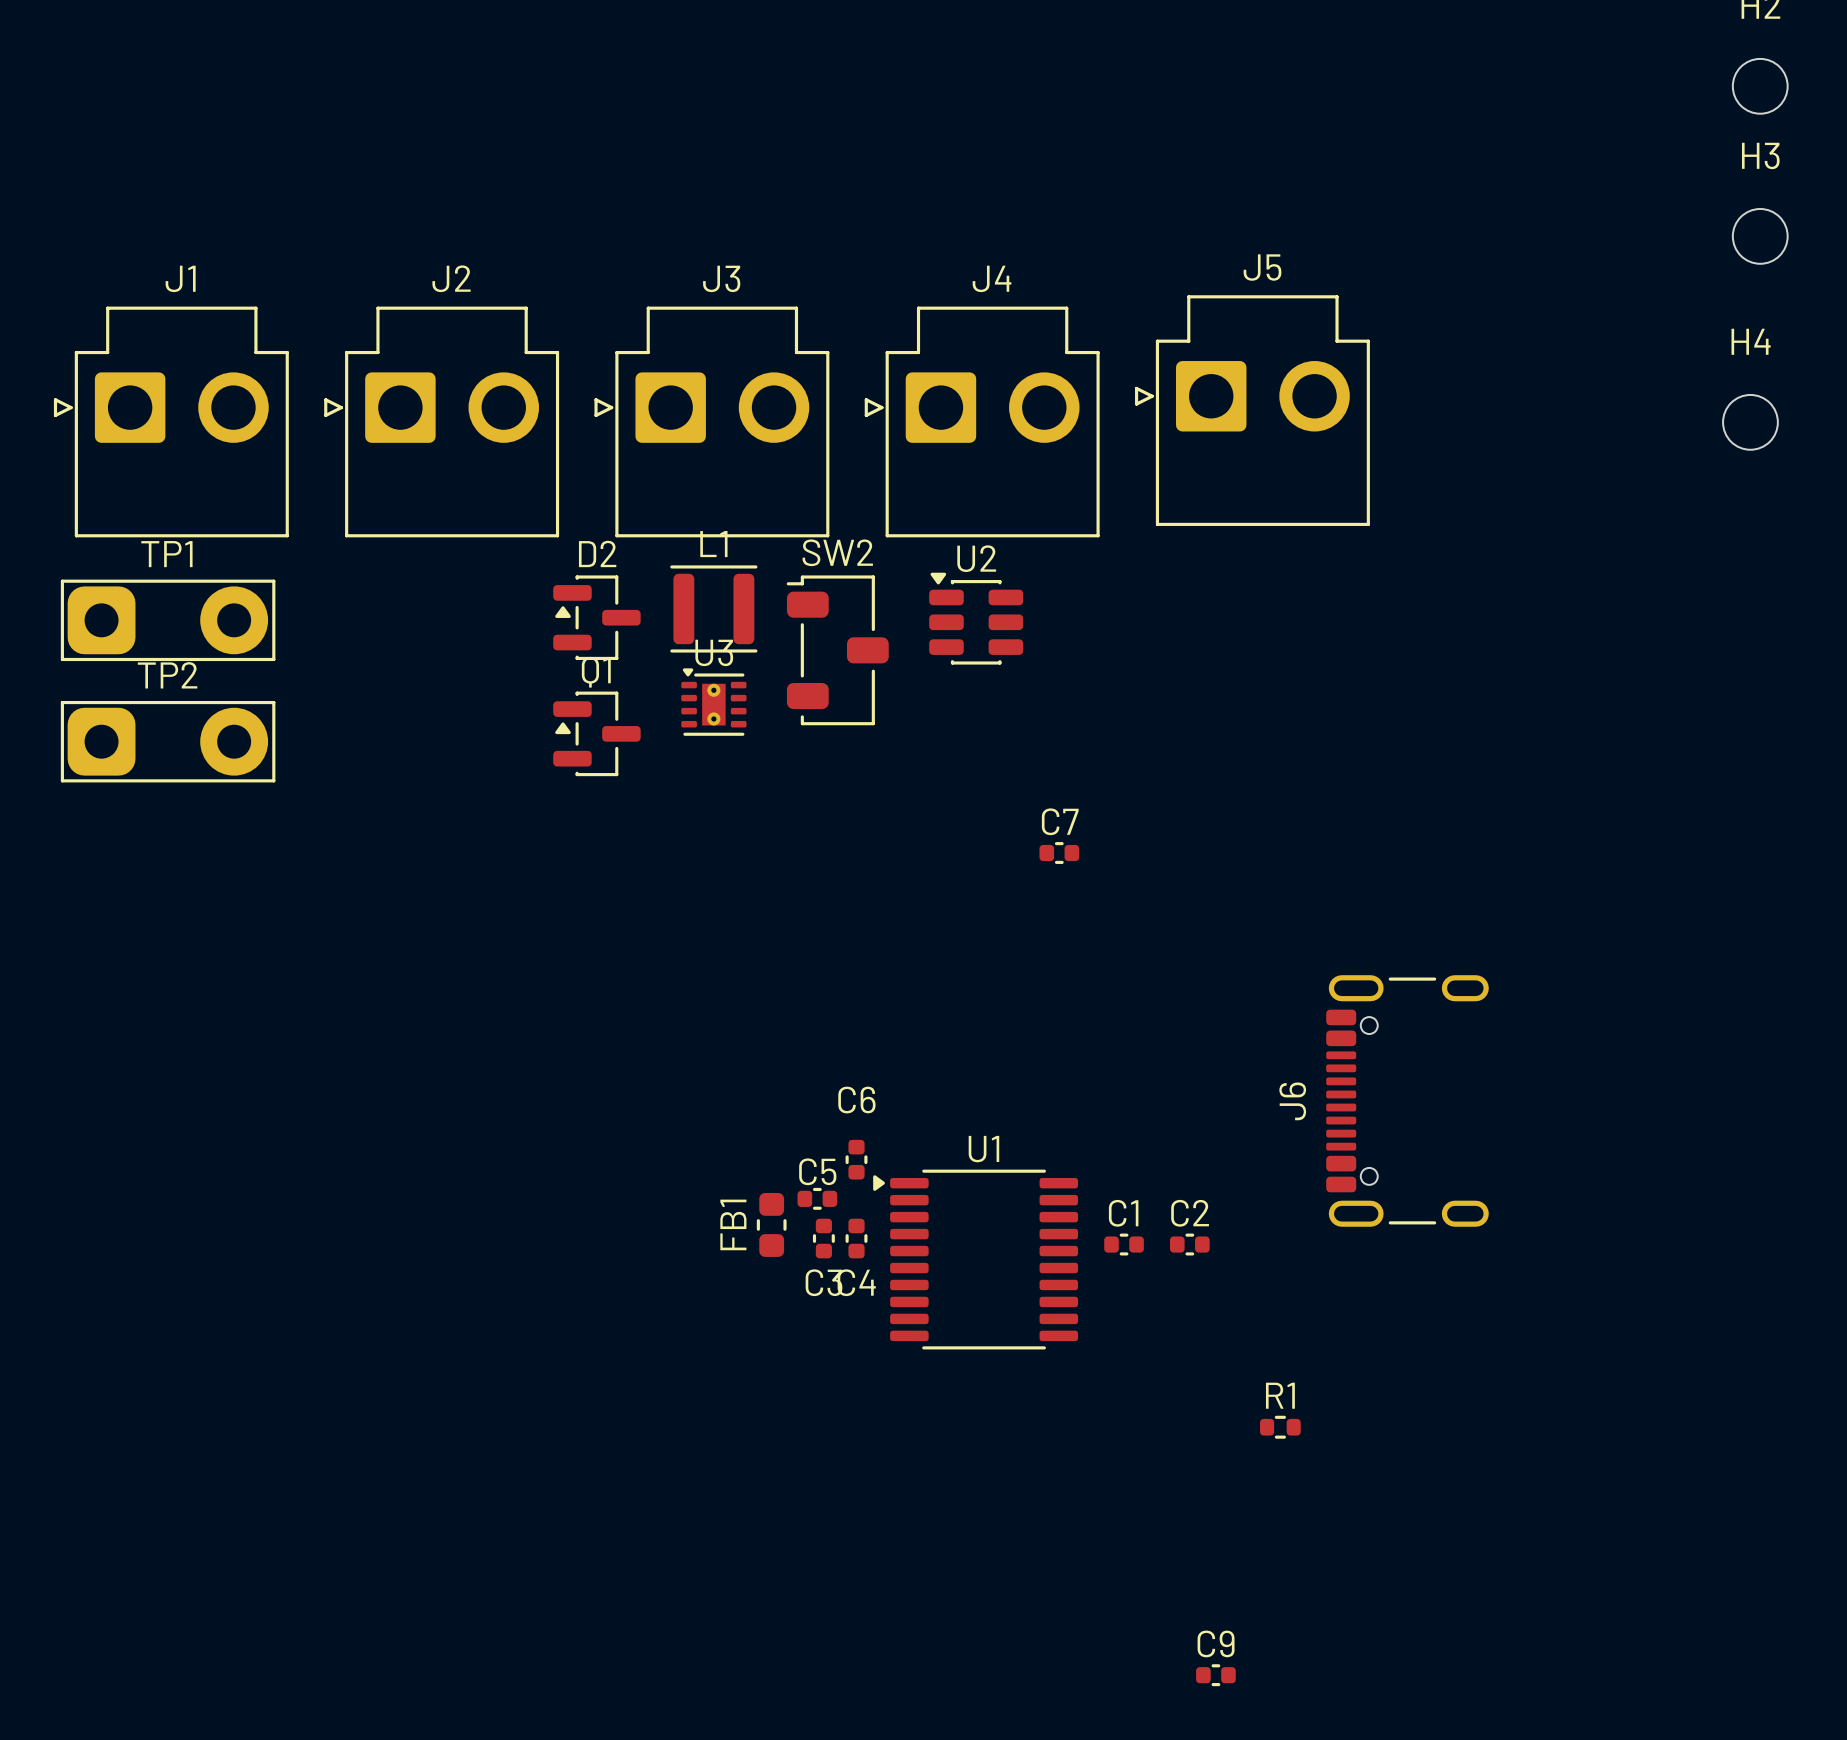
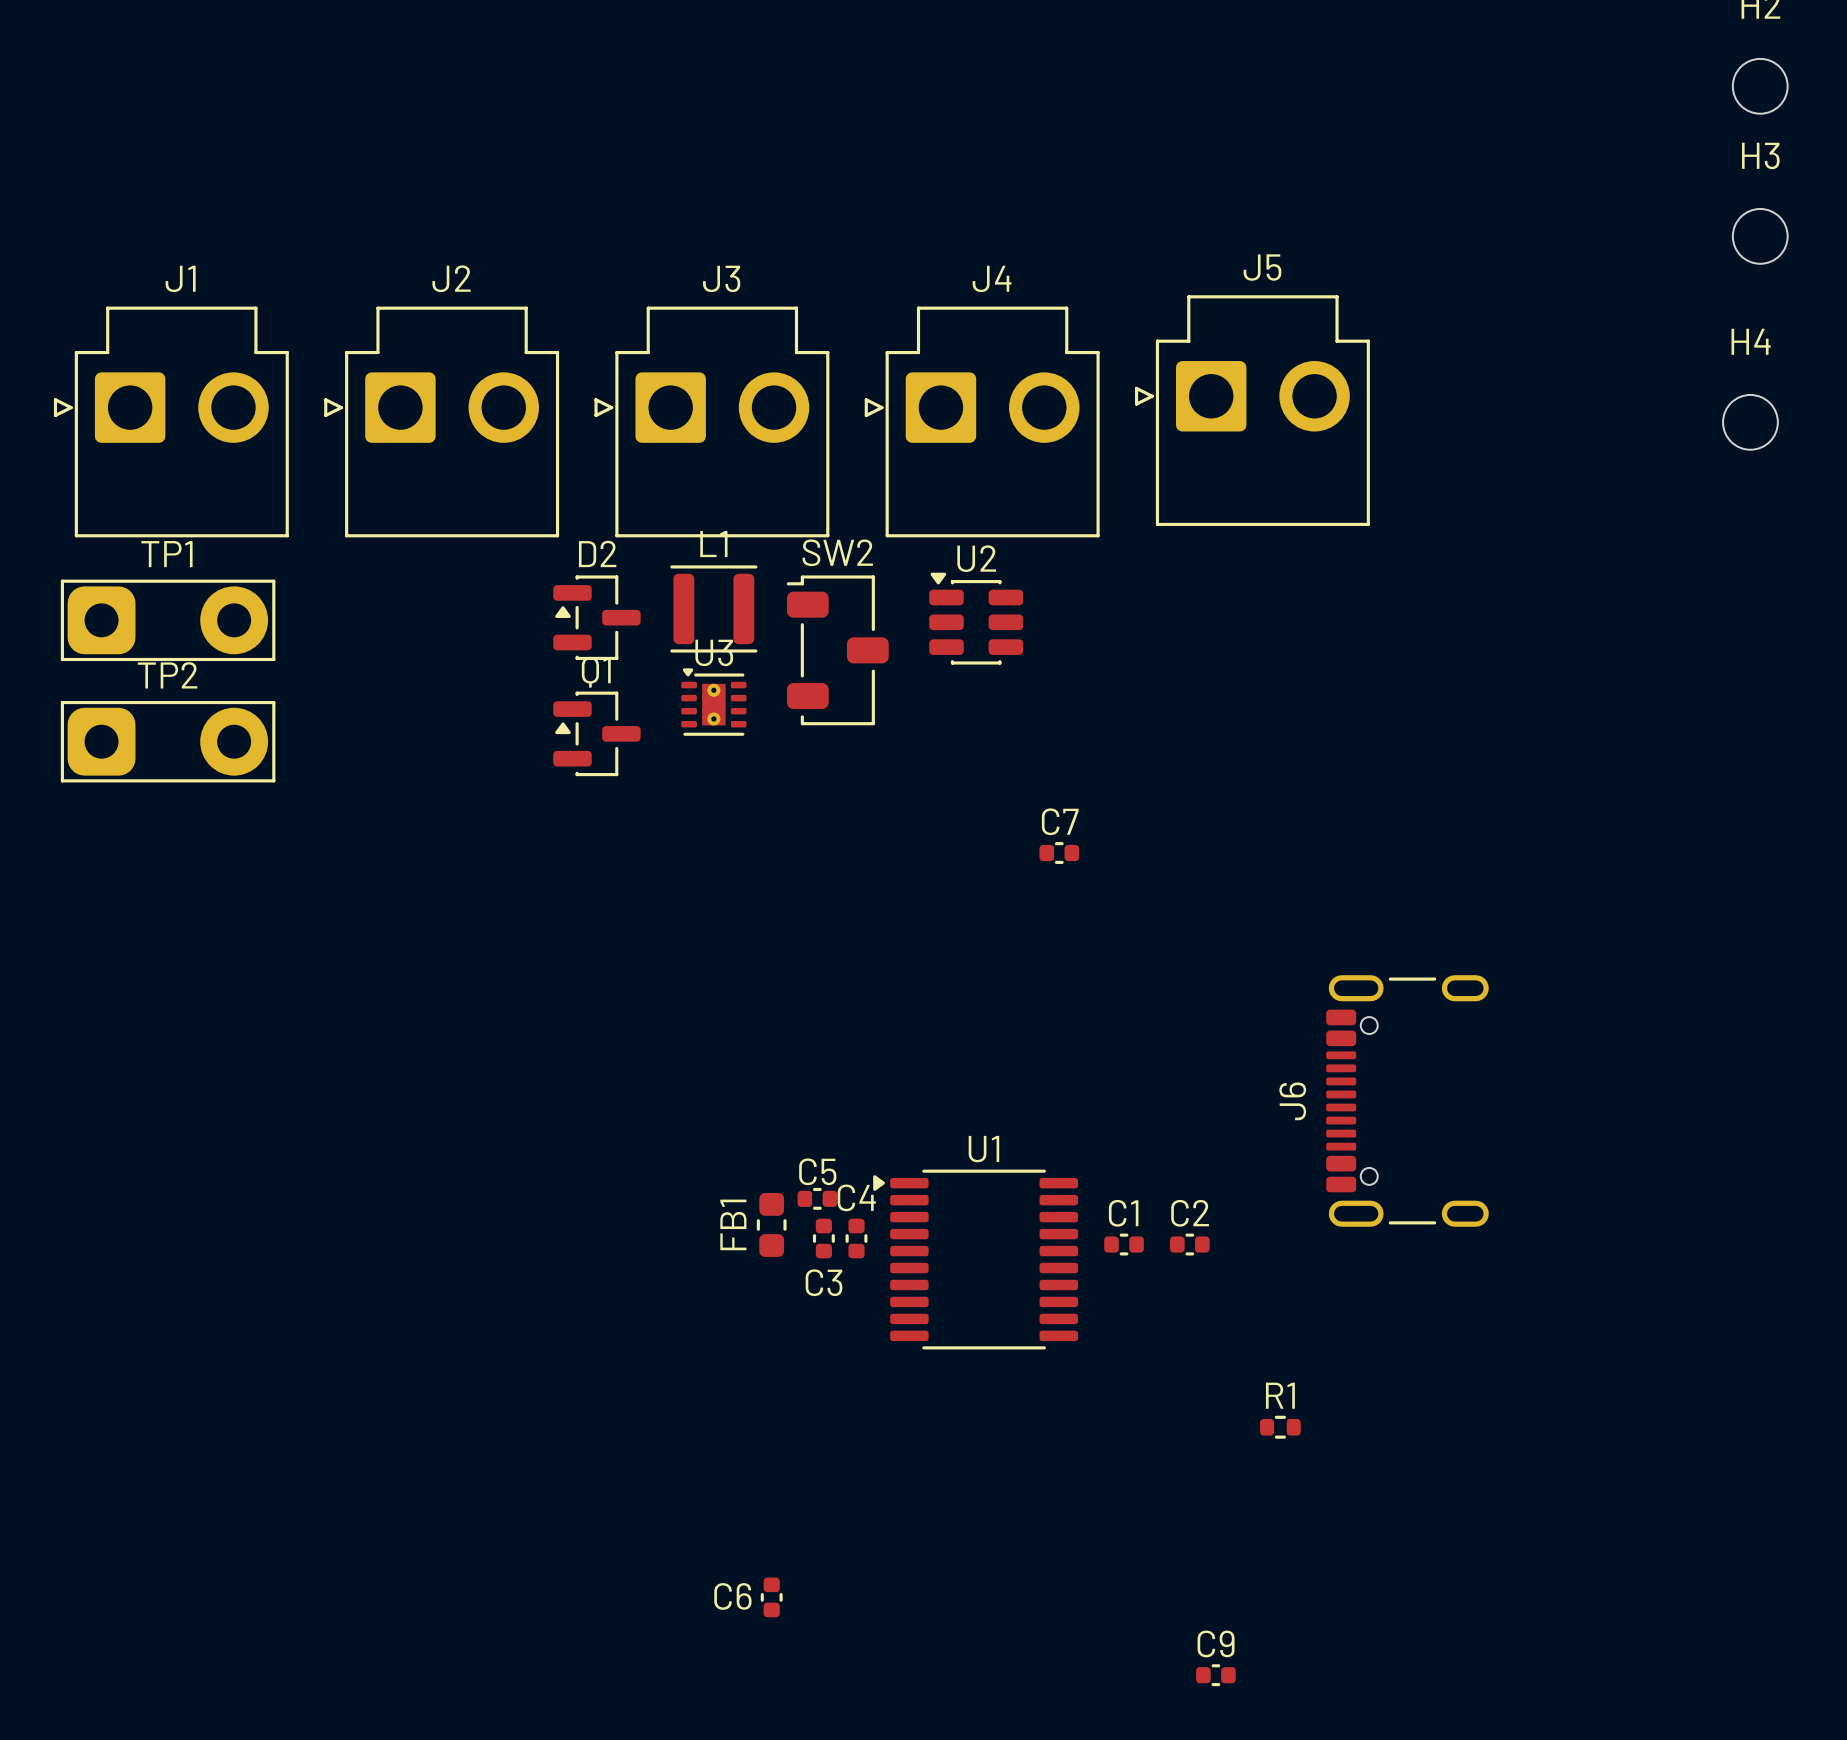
C6 name position: C6 (856, 1100) -> C6 (732, 1596)
C6 position: (856, 1159) -> (771, 1597)
C4 name position: C4 (856, 1282) -> C4 (856, 1197)

